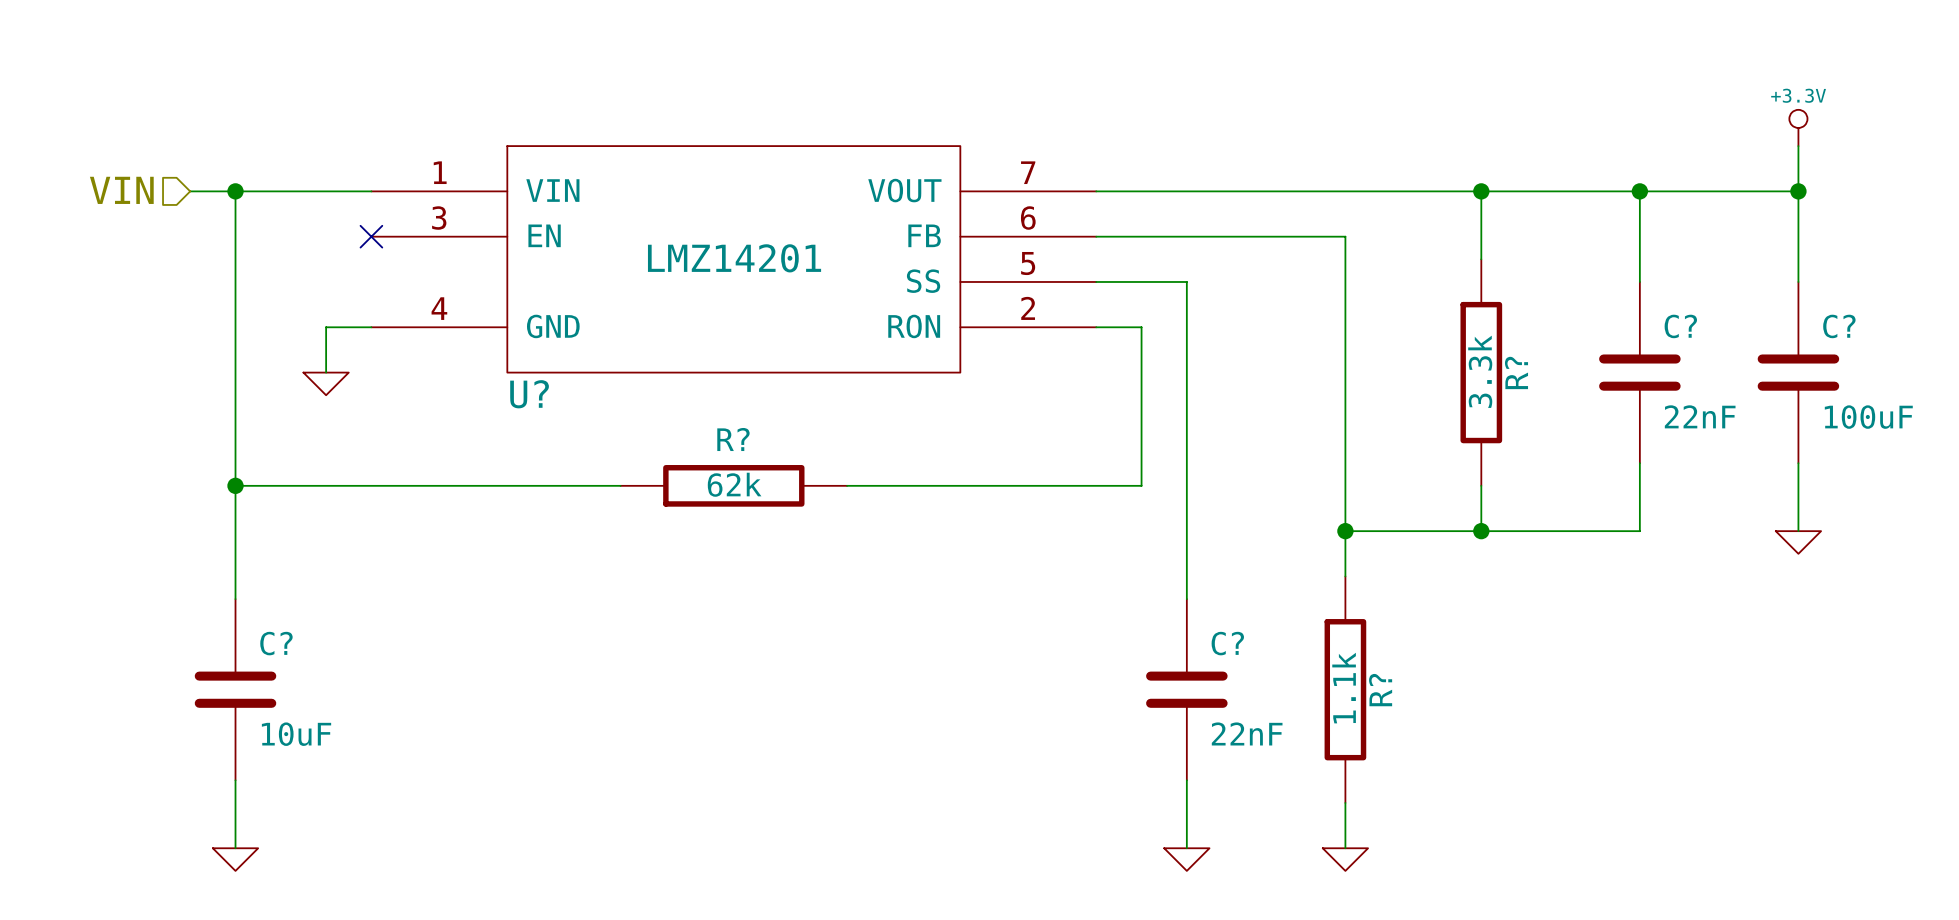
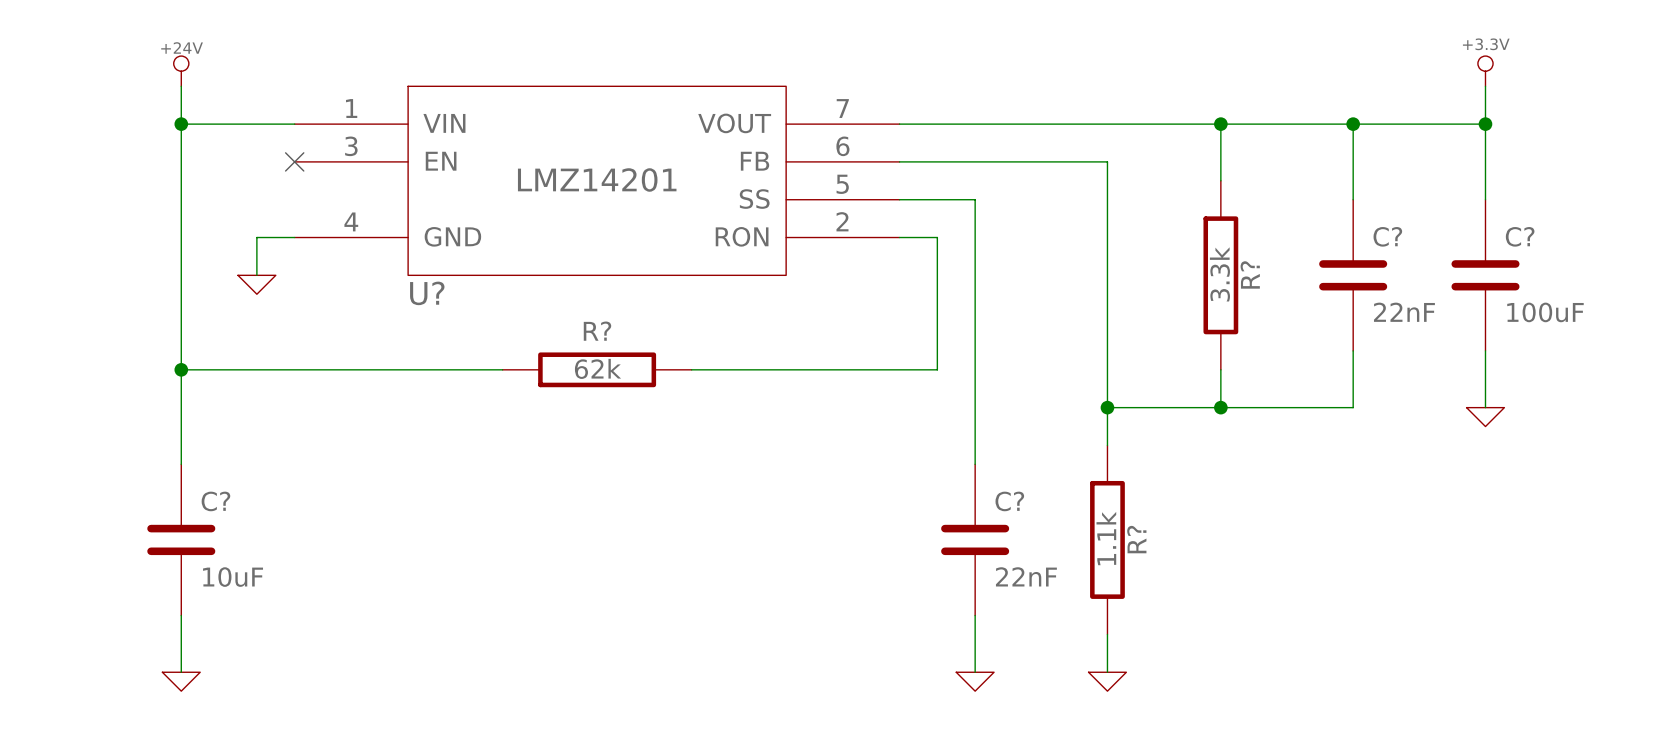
power symbol: none -> +24V (181, 71)
hierarchical label: VIN (121, 190) -> none
wire: (190, 191) (235, 191) -> (181, 86) (181, 124)

